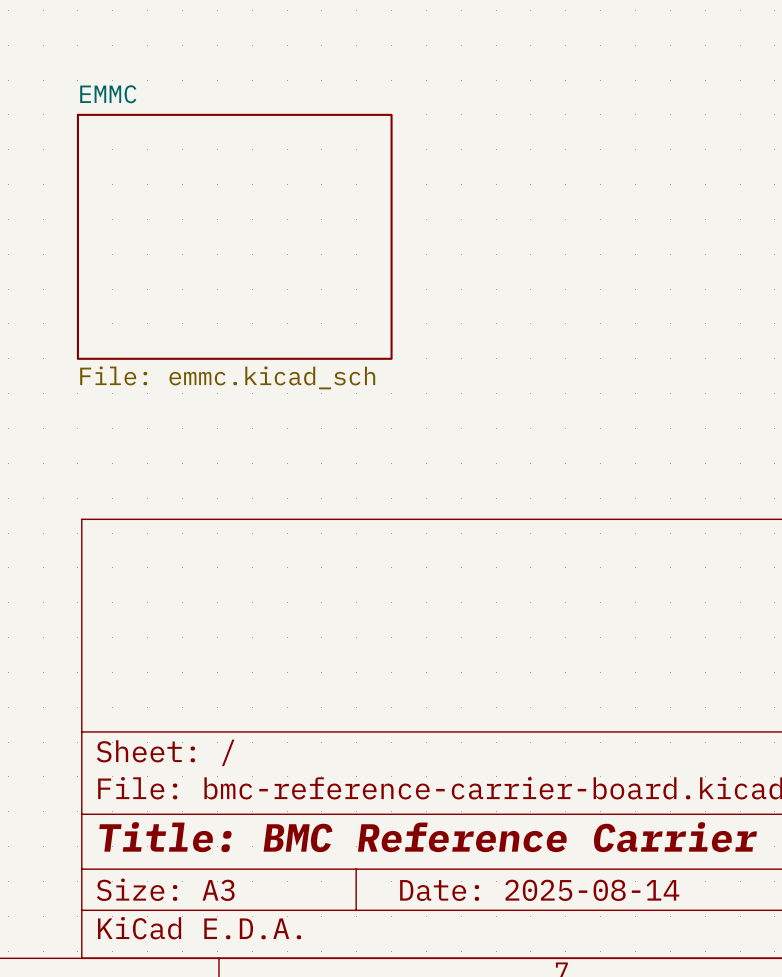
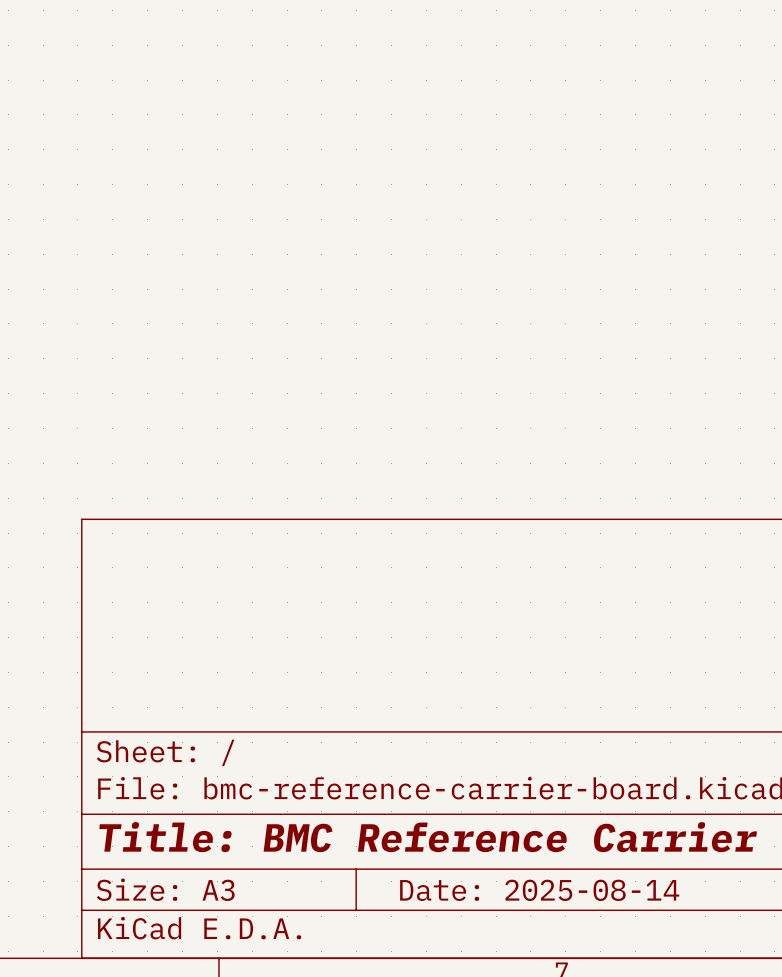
sheet EMMC: File: emmc.kicad_sch (234, 236) -> none

